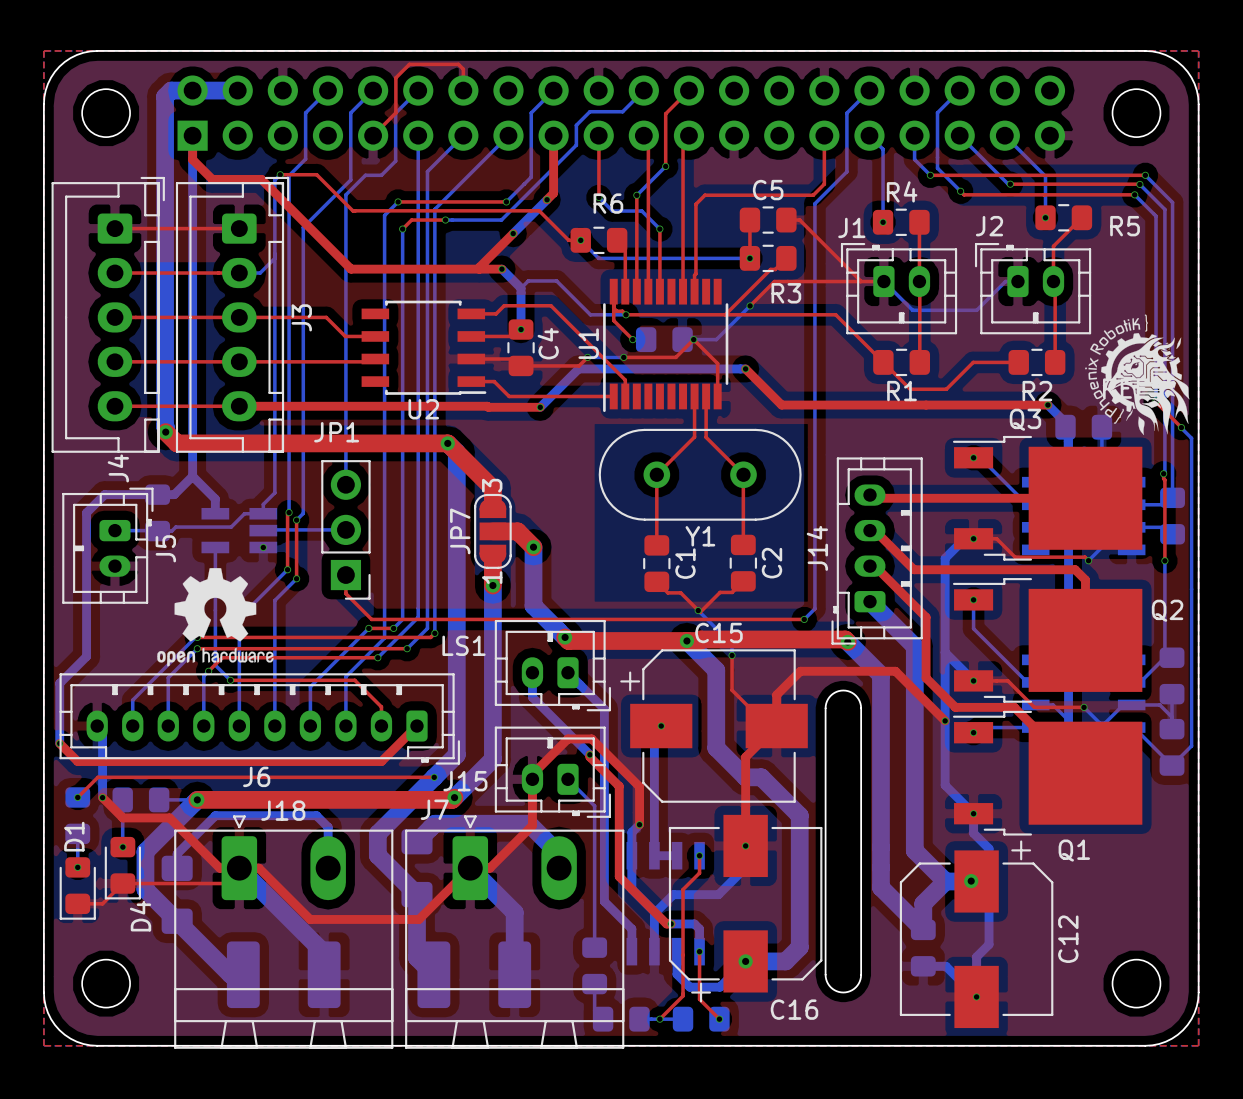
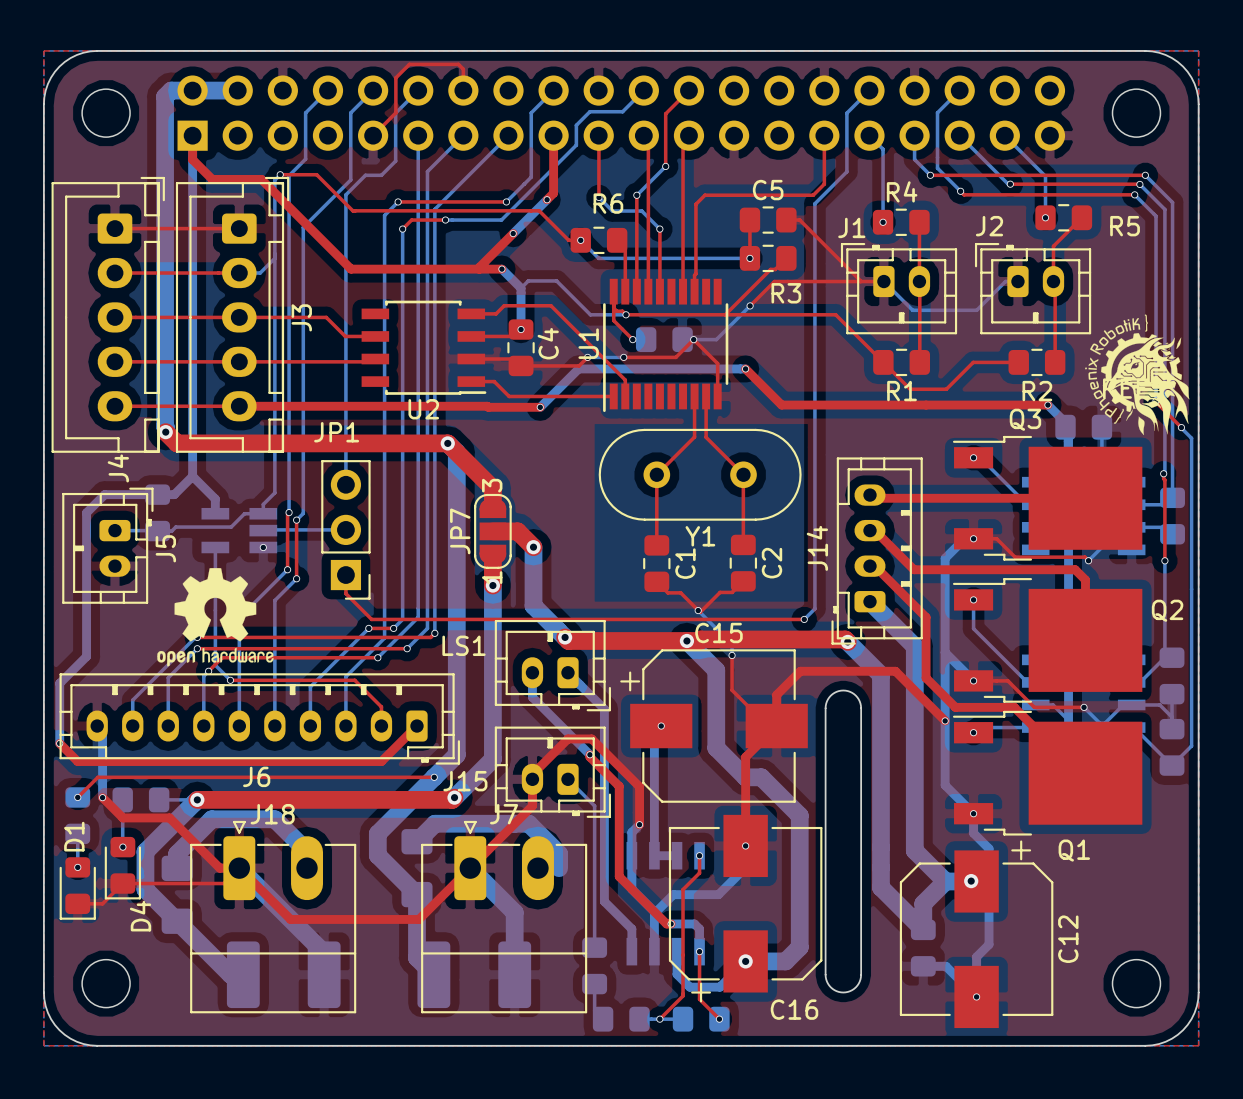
top track: (532, 805) (532, 825) (489, 868) (470, 868) -> (532, 805) (470, 868)
J7 name position: J7 (434, 809) -> J7 (504, 814)
J18 footprint: [174, 815, 394, 1049] -> [190, 820, 357, 1014]
J7 footprint: [405, 815, 625, 1049] -> [421, 820, 588, 1014]
bottom track: (211, 819) (215, 815) (316, 815) (328, 827) (328, 868) -> (211, 819) (274, 819) (307, 851) (307, 868)
bottom track width: thin (211, 819) (177, 853) (177, 868) -> thick (211, 819) (177, 853) (177, 868)
top track: (239, 868) (258, 868) (310, 919) -> (239, 868) (290, 919) (310, 919)

